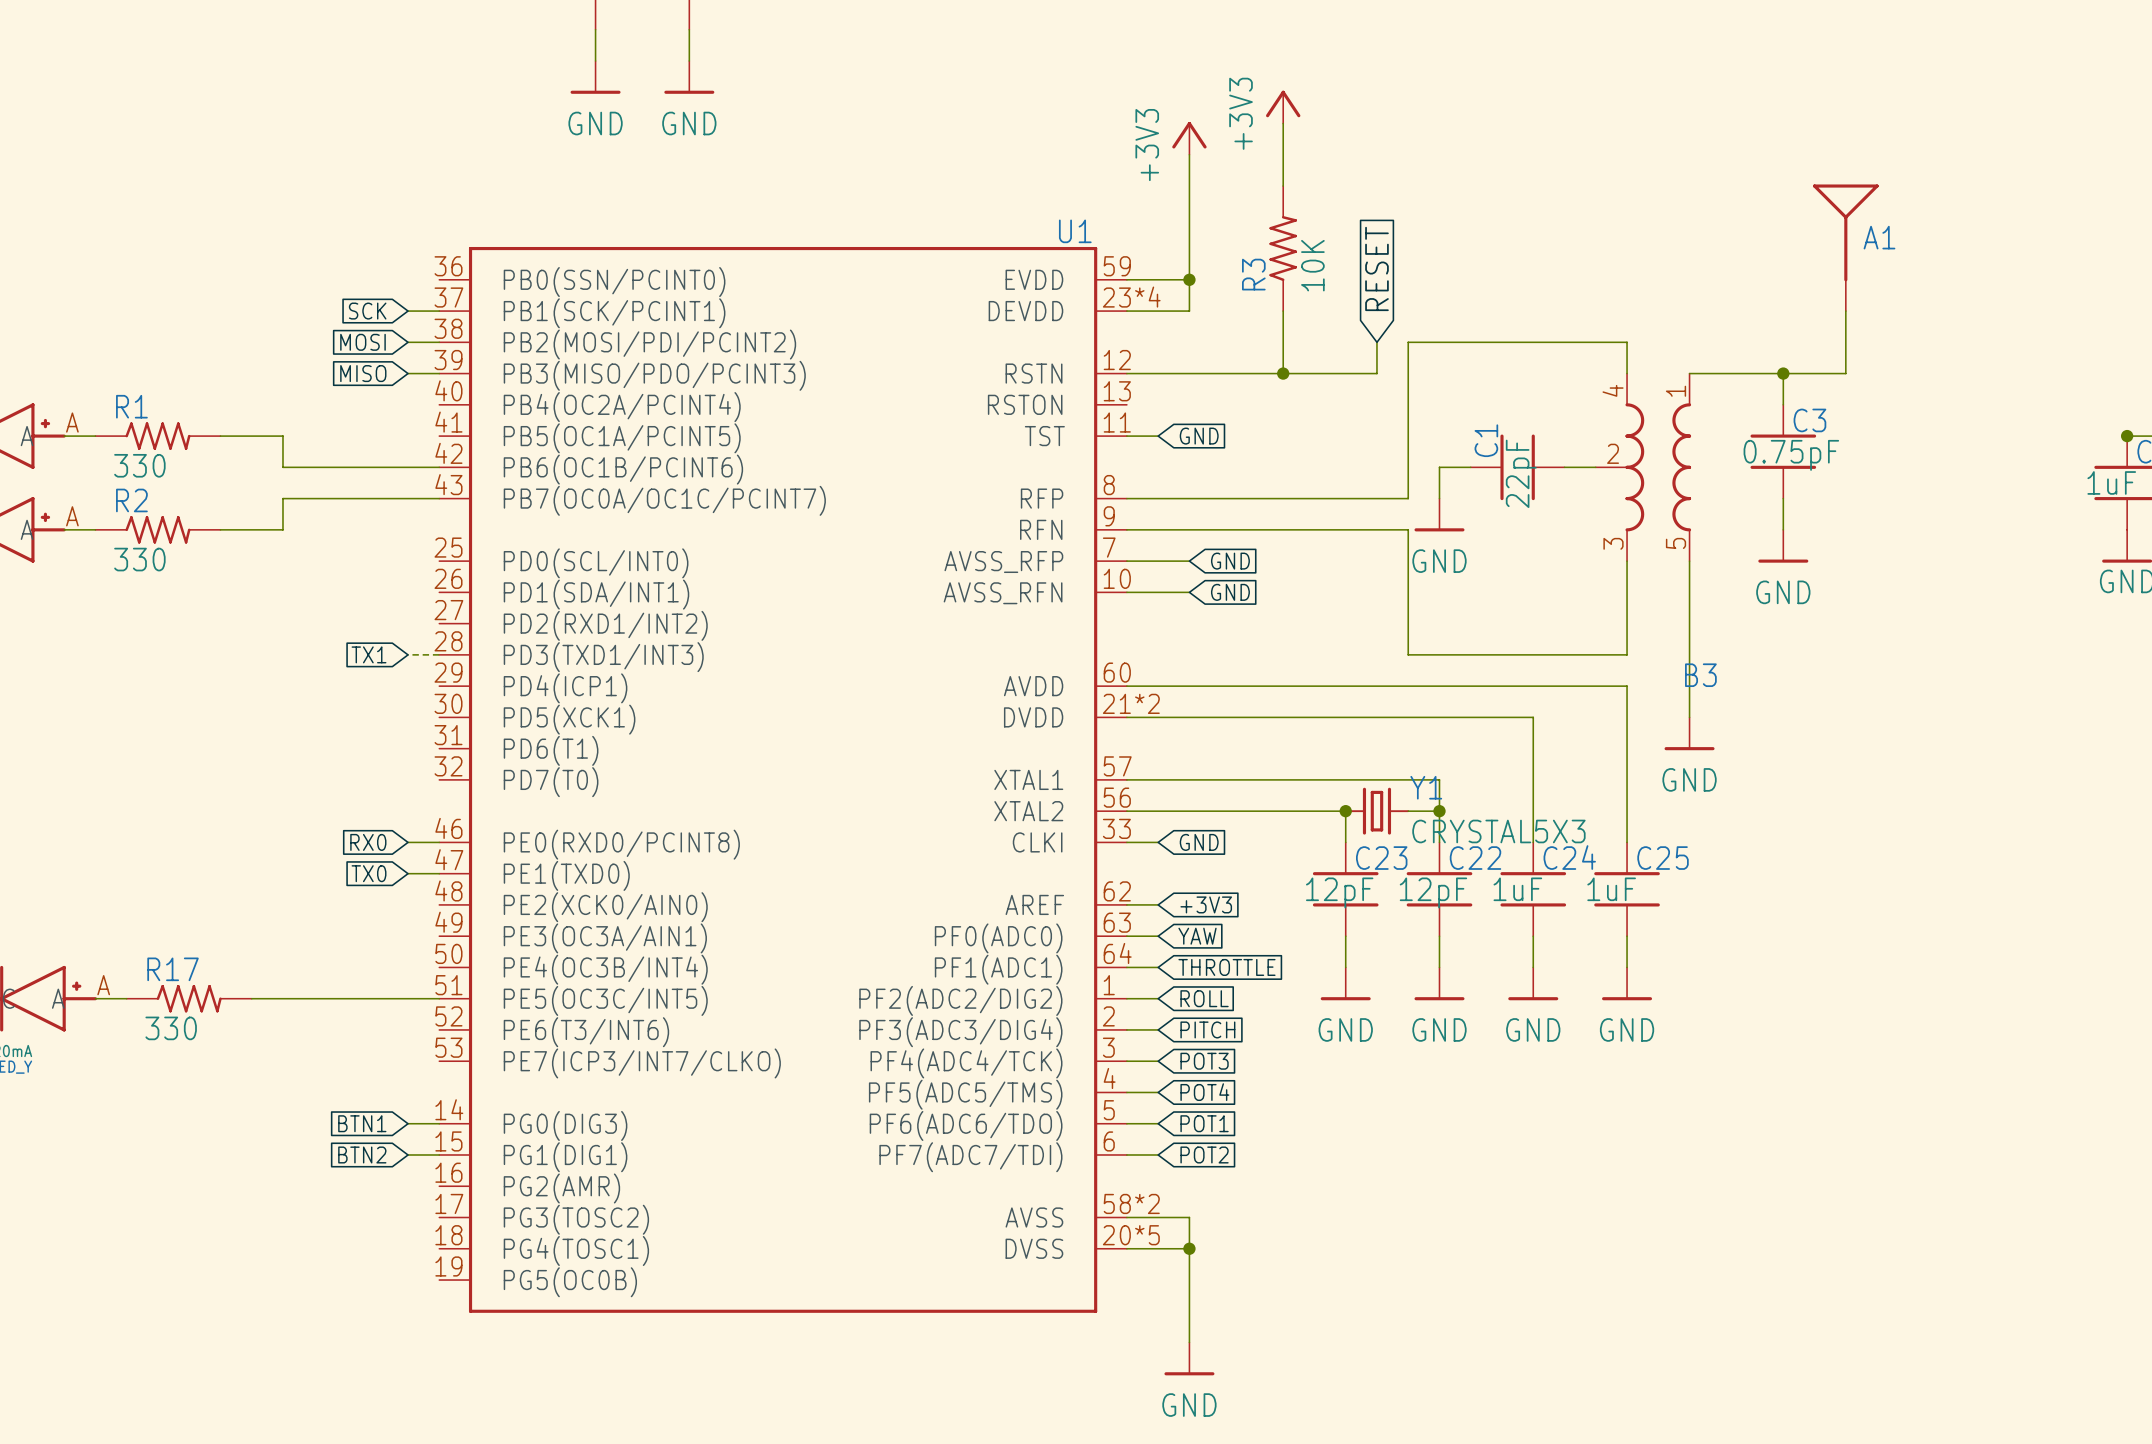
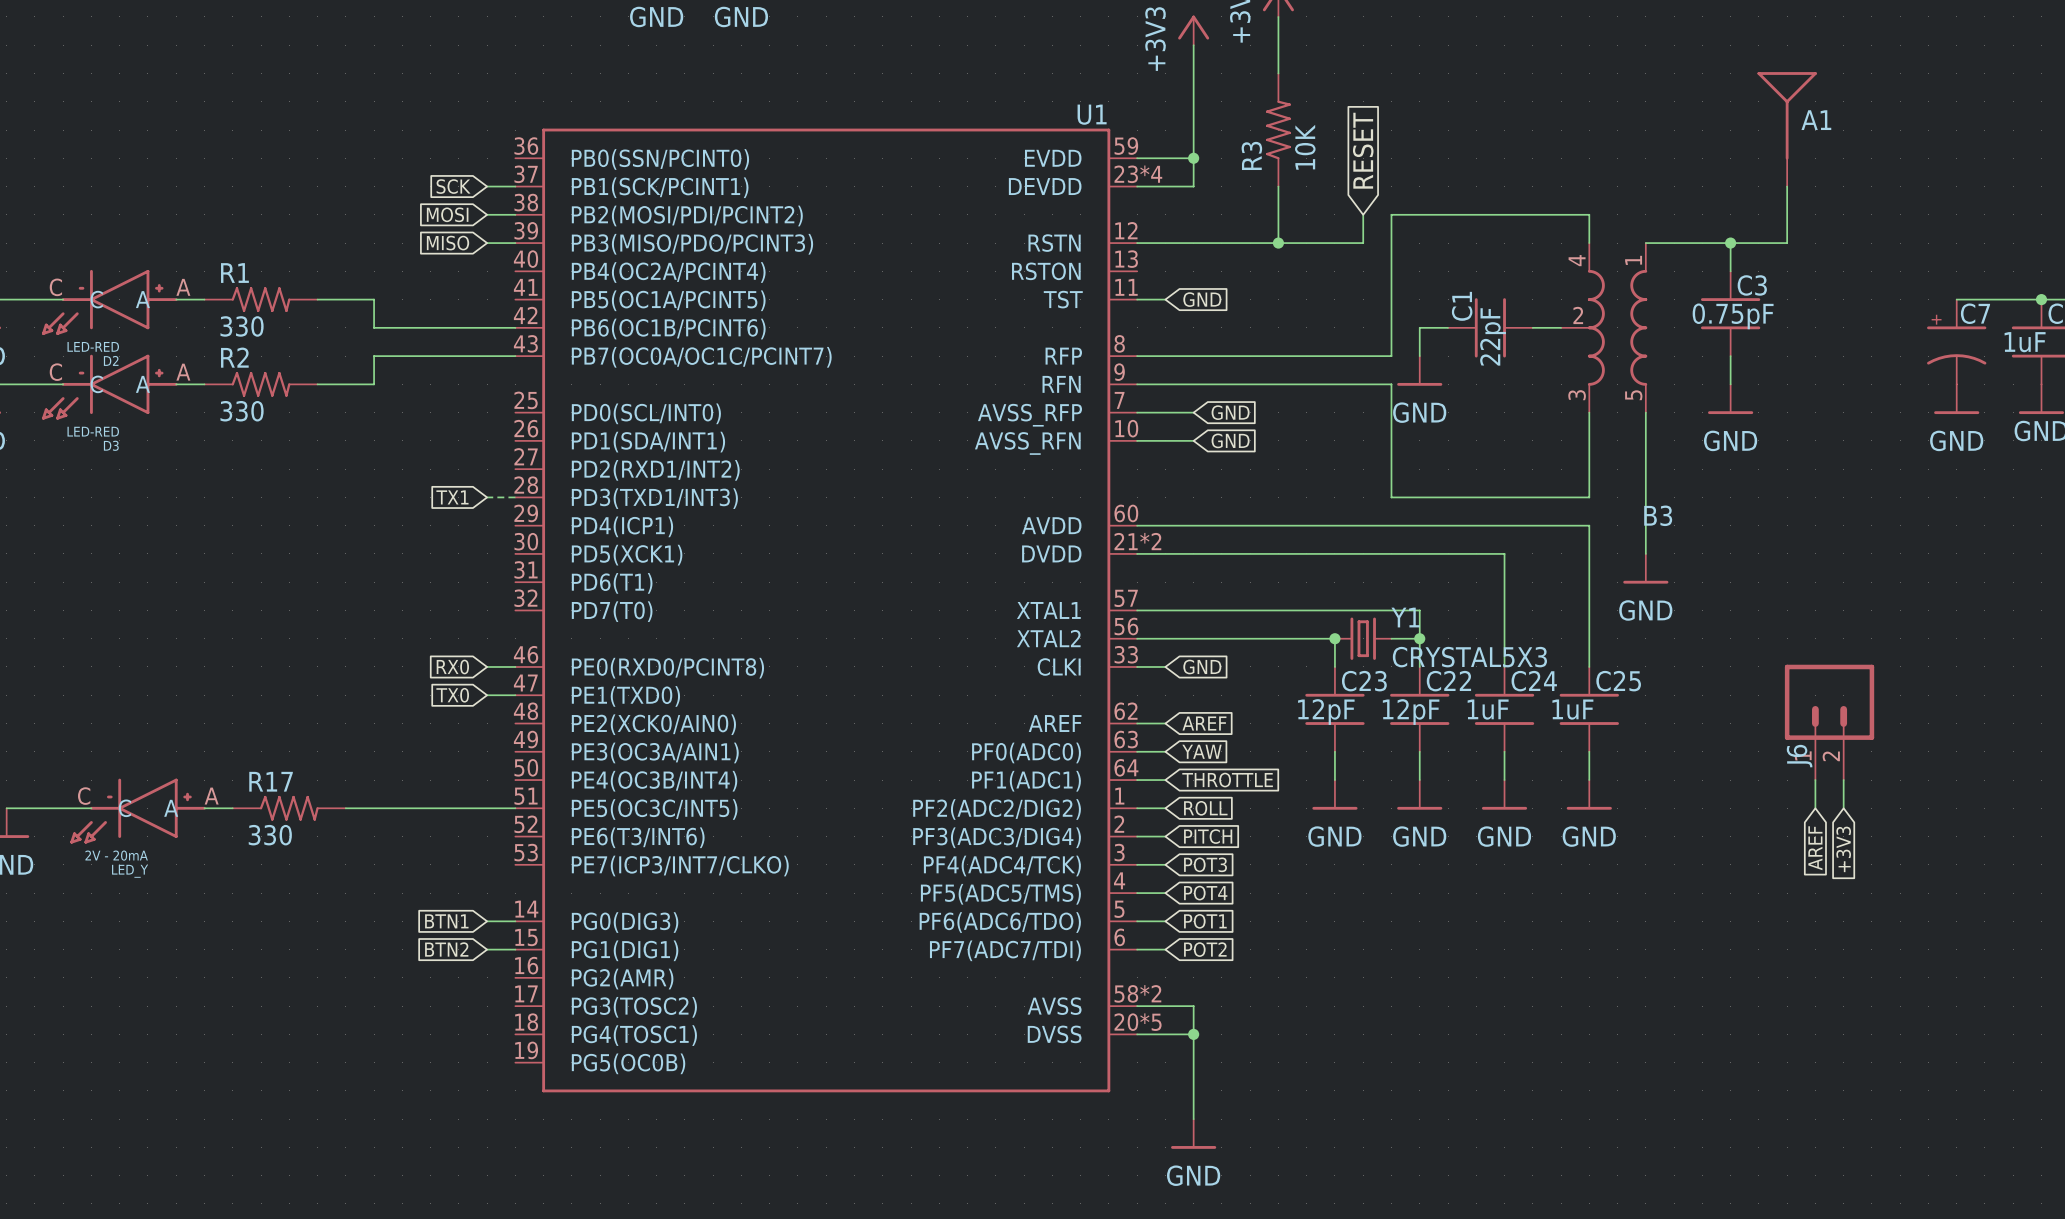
wire: none -> (1956, 299) (2041, 299)
C7: none -> (1956, 341)
power symbol: none -> GND (1956, 399)
J6: none -> (1829, 722)
global label: +3V3 (1206, 904) -> AREF (1204, 723)
wire: none -> (1815, 780) (1815, 808)
wire: none -> (1843, 780) (1843, 808)
global label: none -> AREF (1815, 848)
global label: none -> +3V3 (1843, 849)

